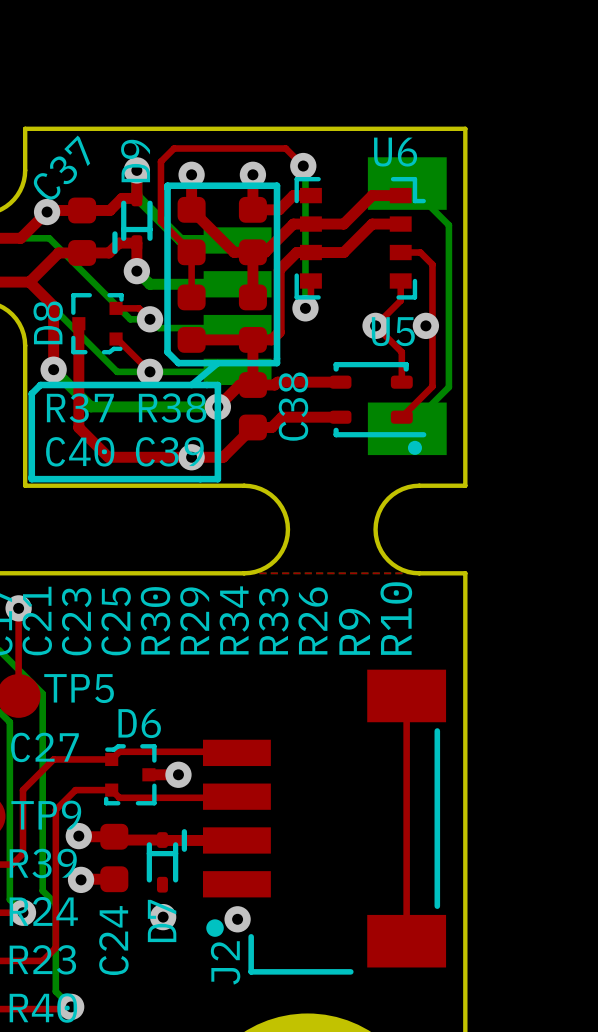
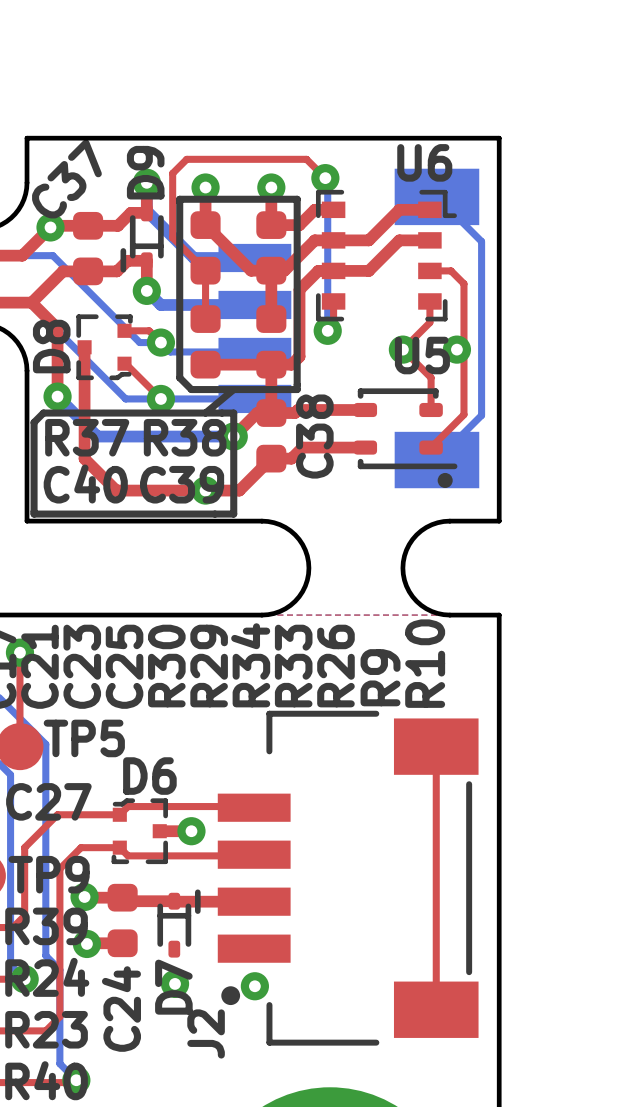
J2 footprint: [202, 669, 447, 975] -> [217, 710, 479, 1046]

